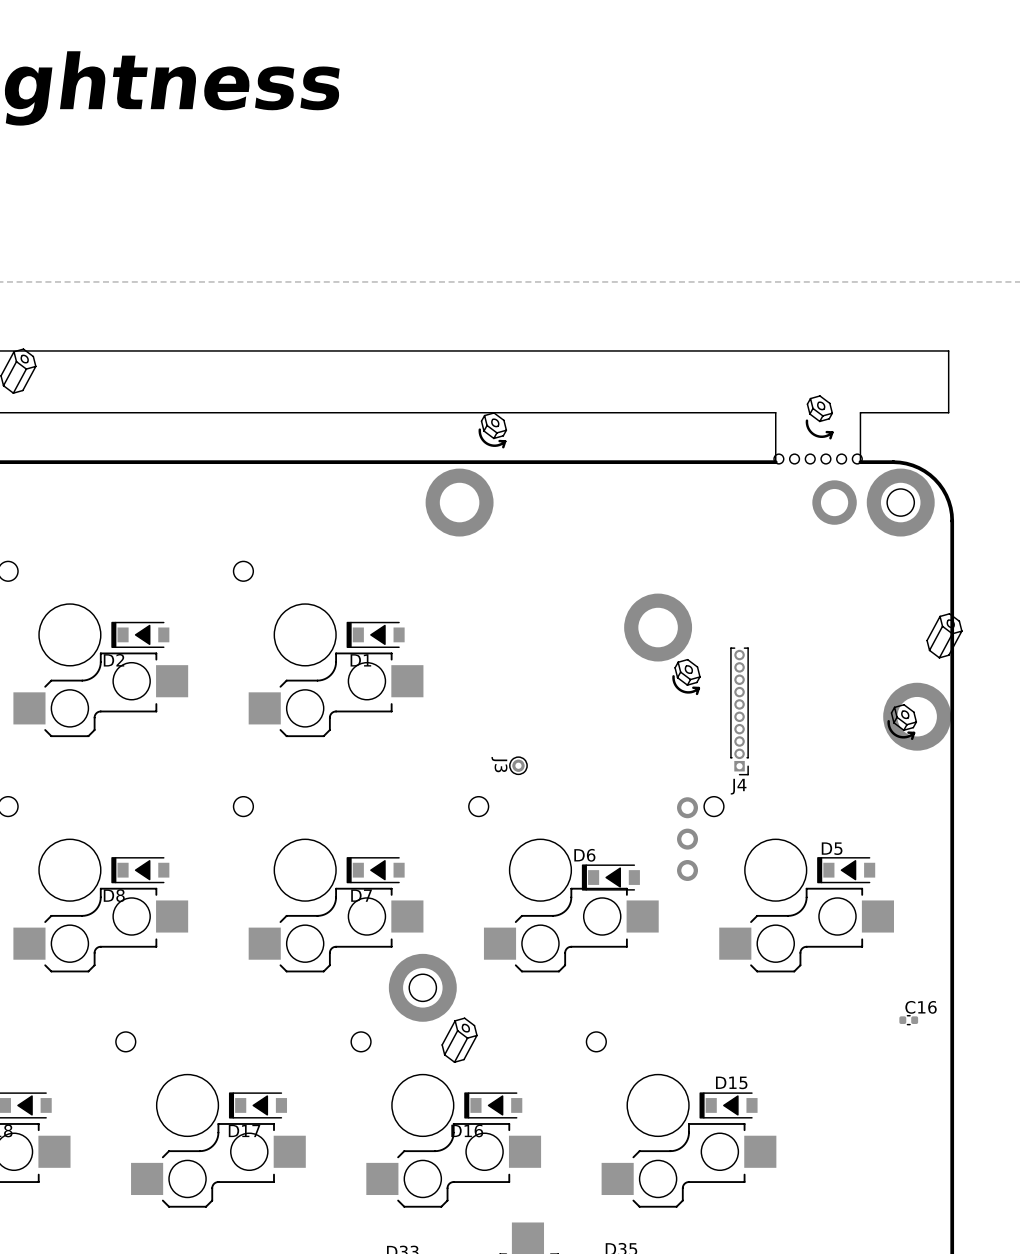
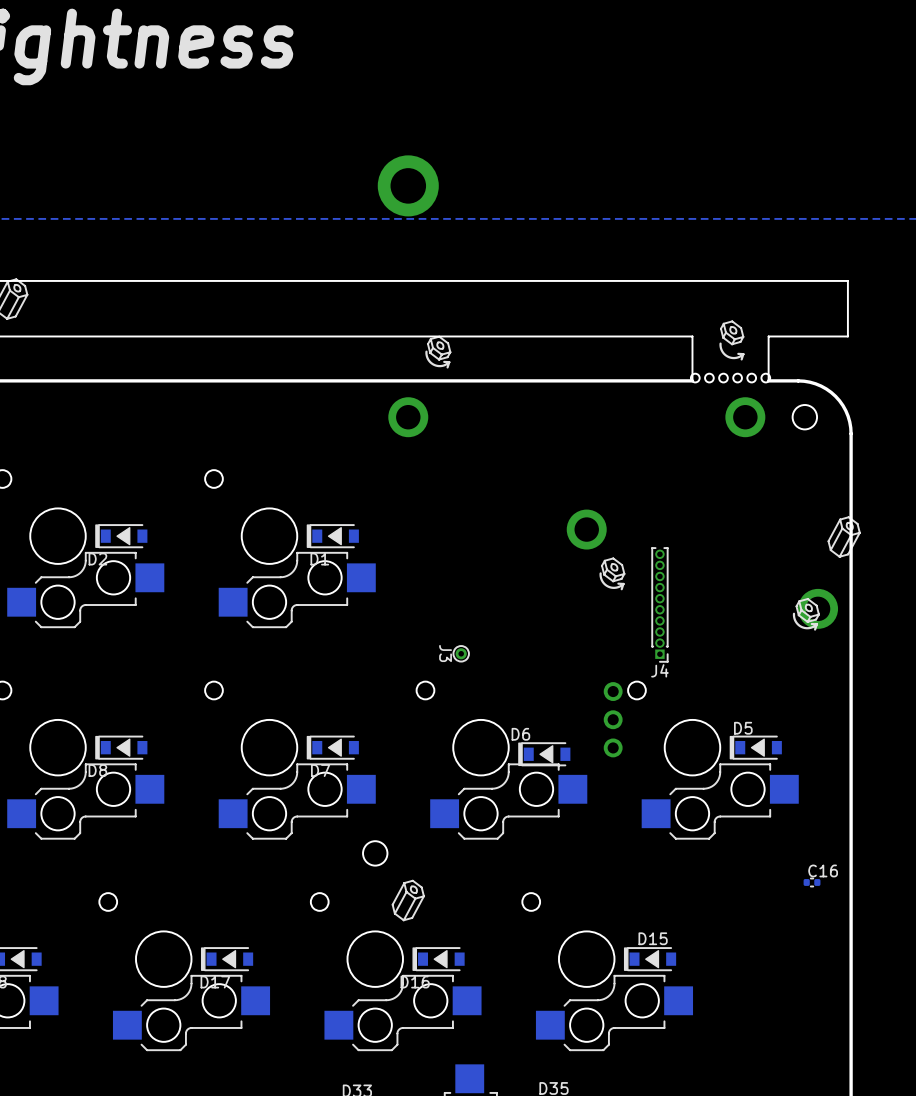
part: none -> (408, 185)
part: (459, 502) -> none
part: (900, 502) -> none
part: (658, 627) -> none
part: (917, 716) -> none
part: (422, 987) -> none

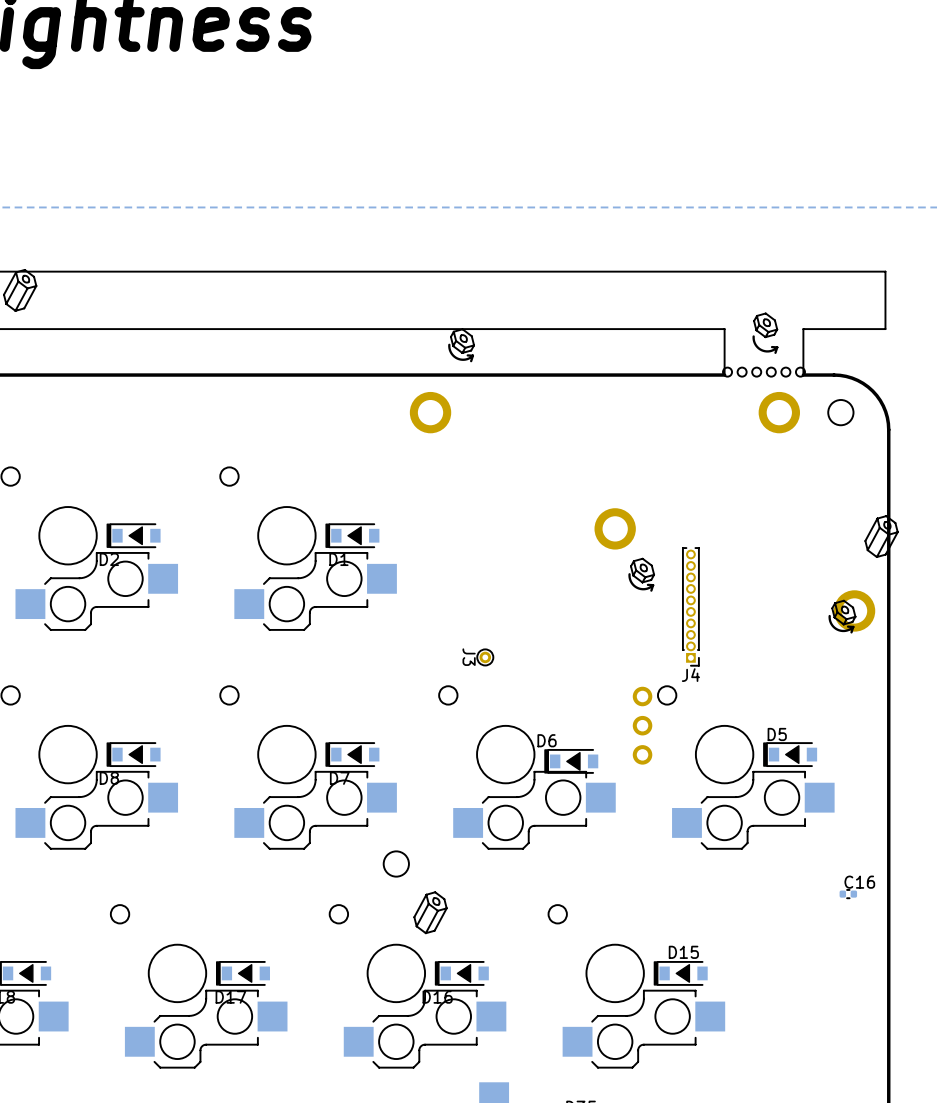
part: (408, 185) -> none

